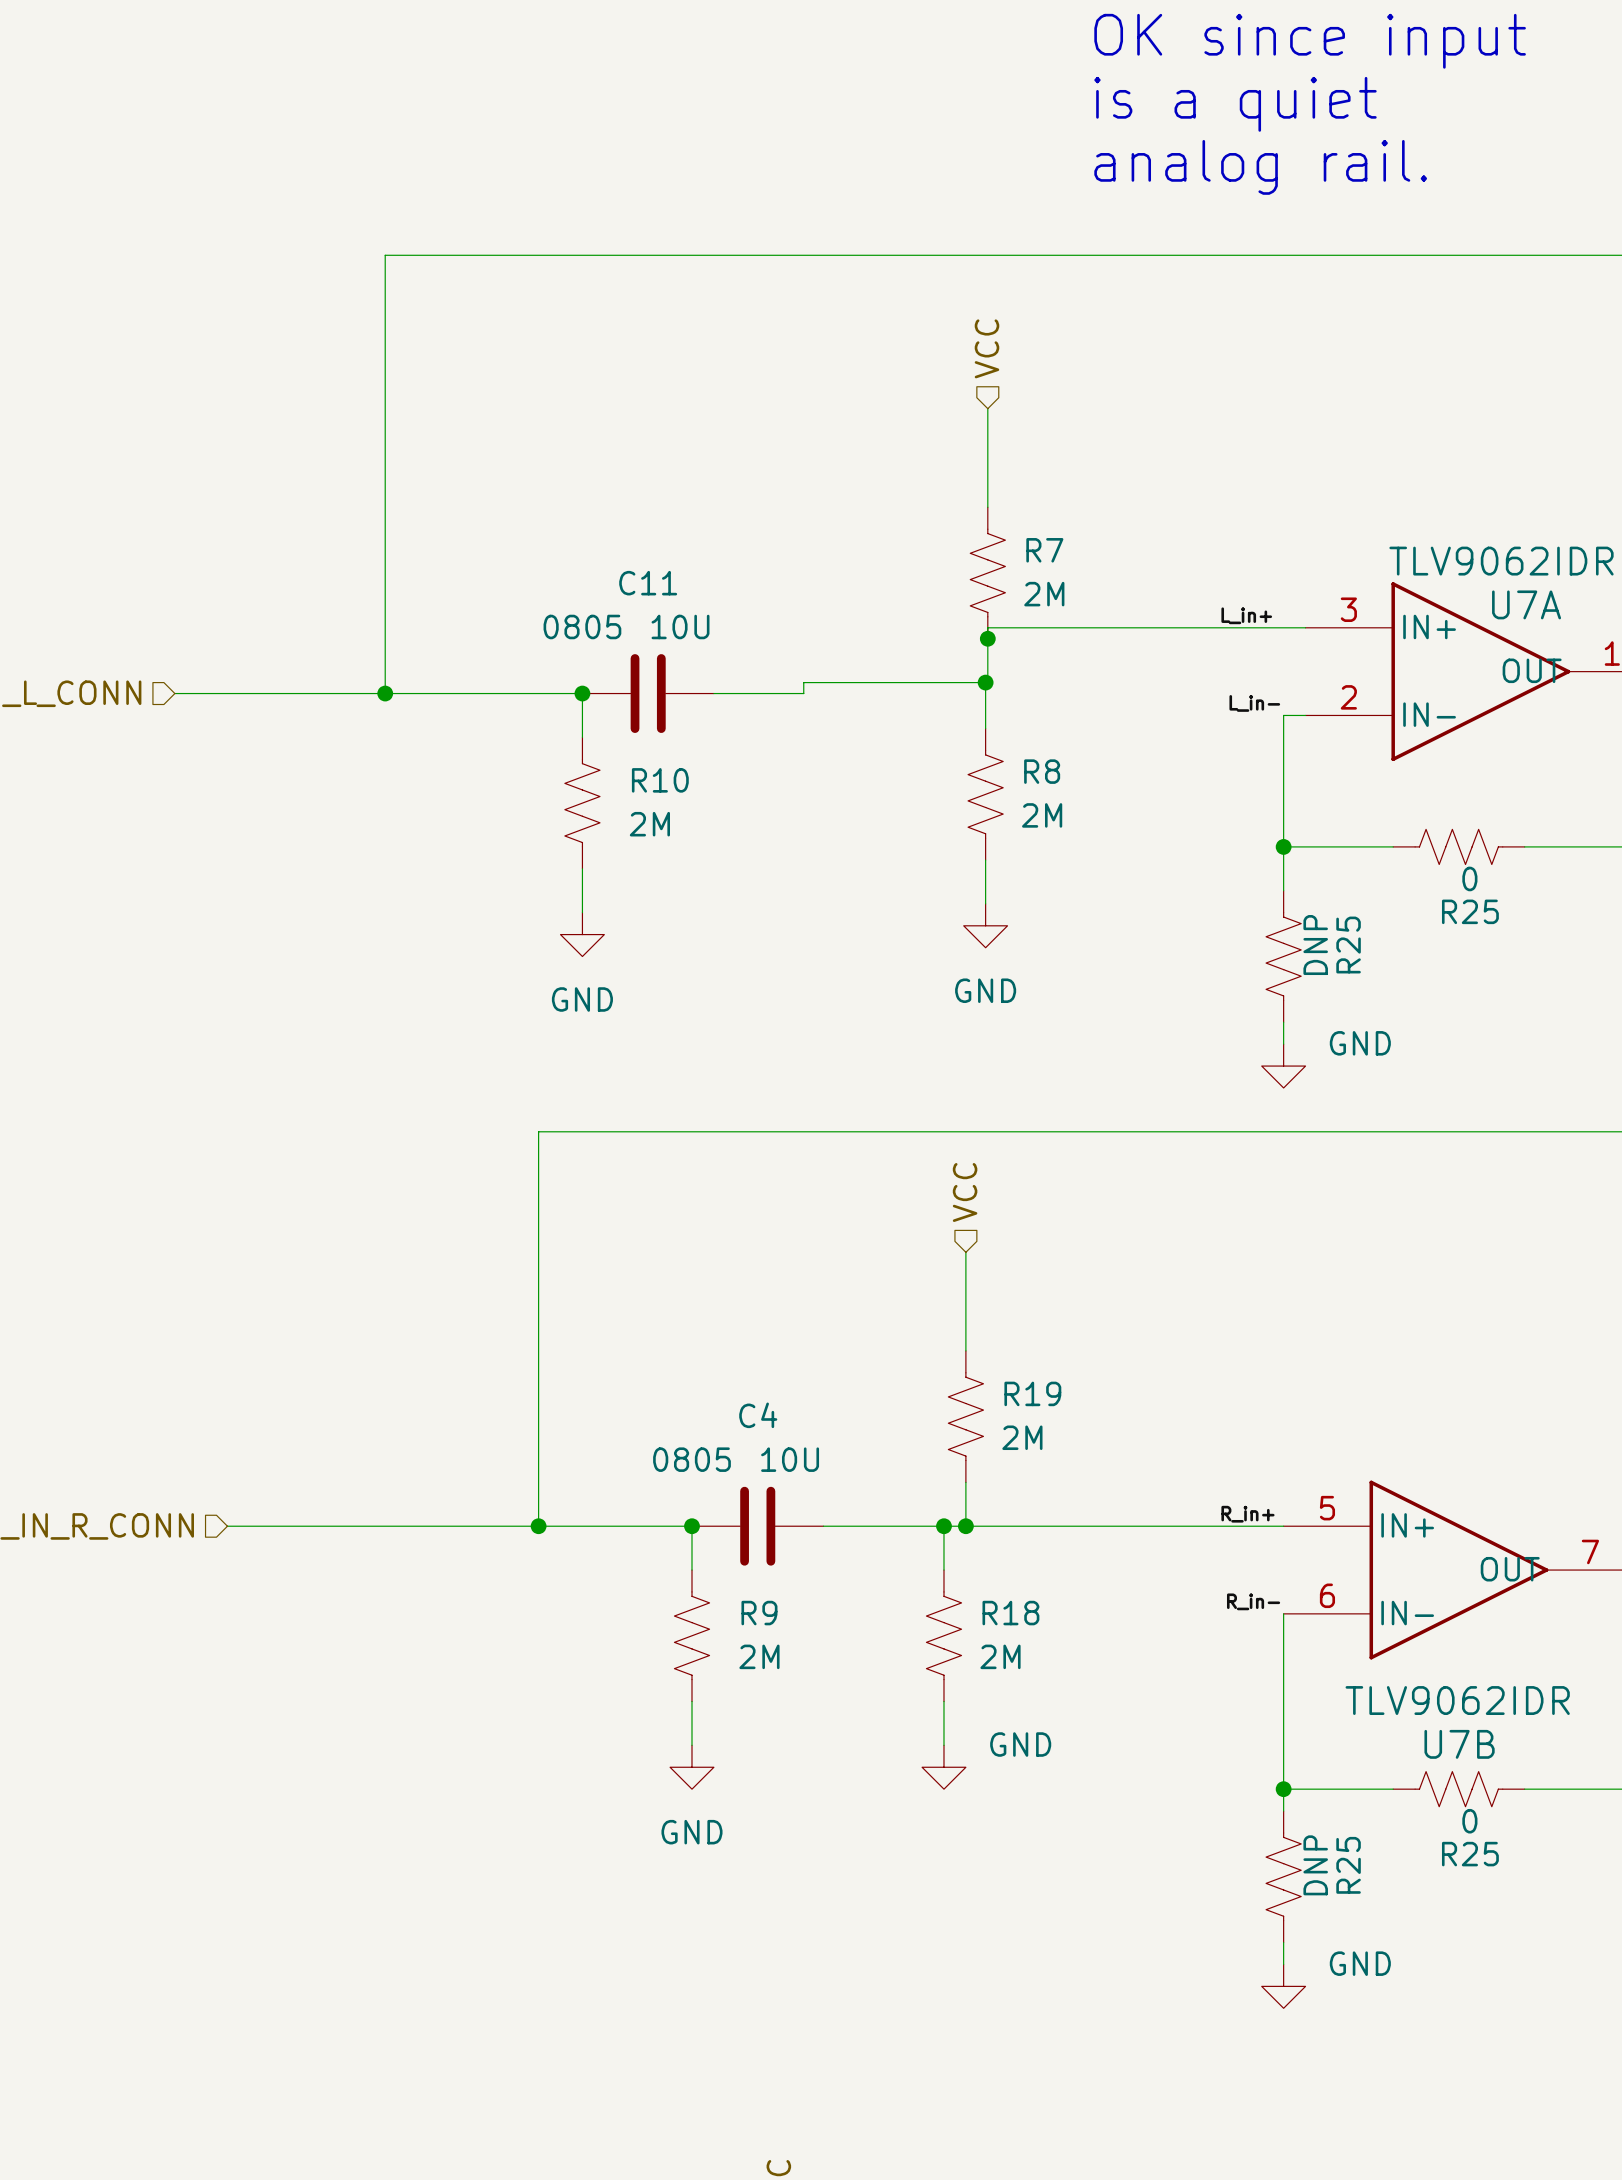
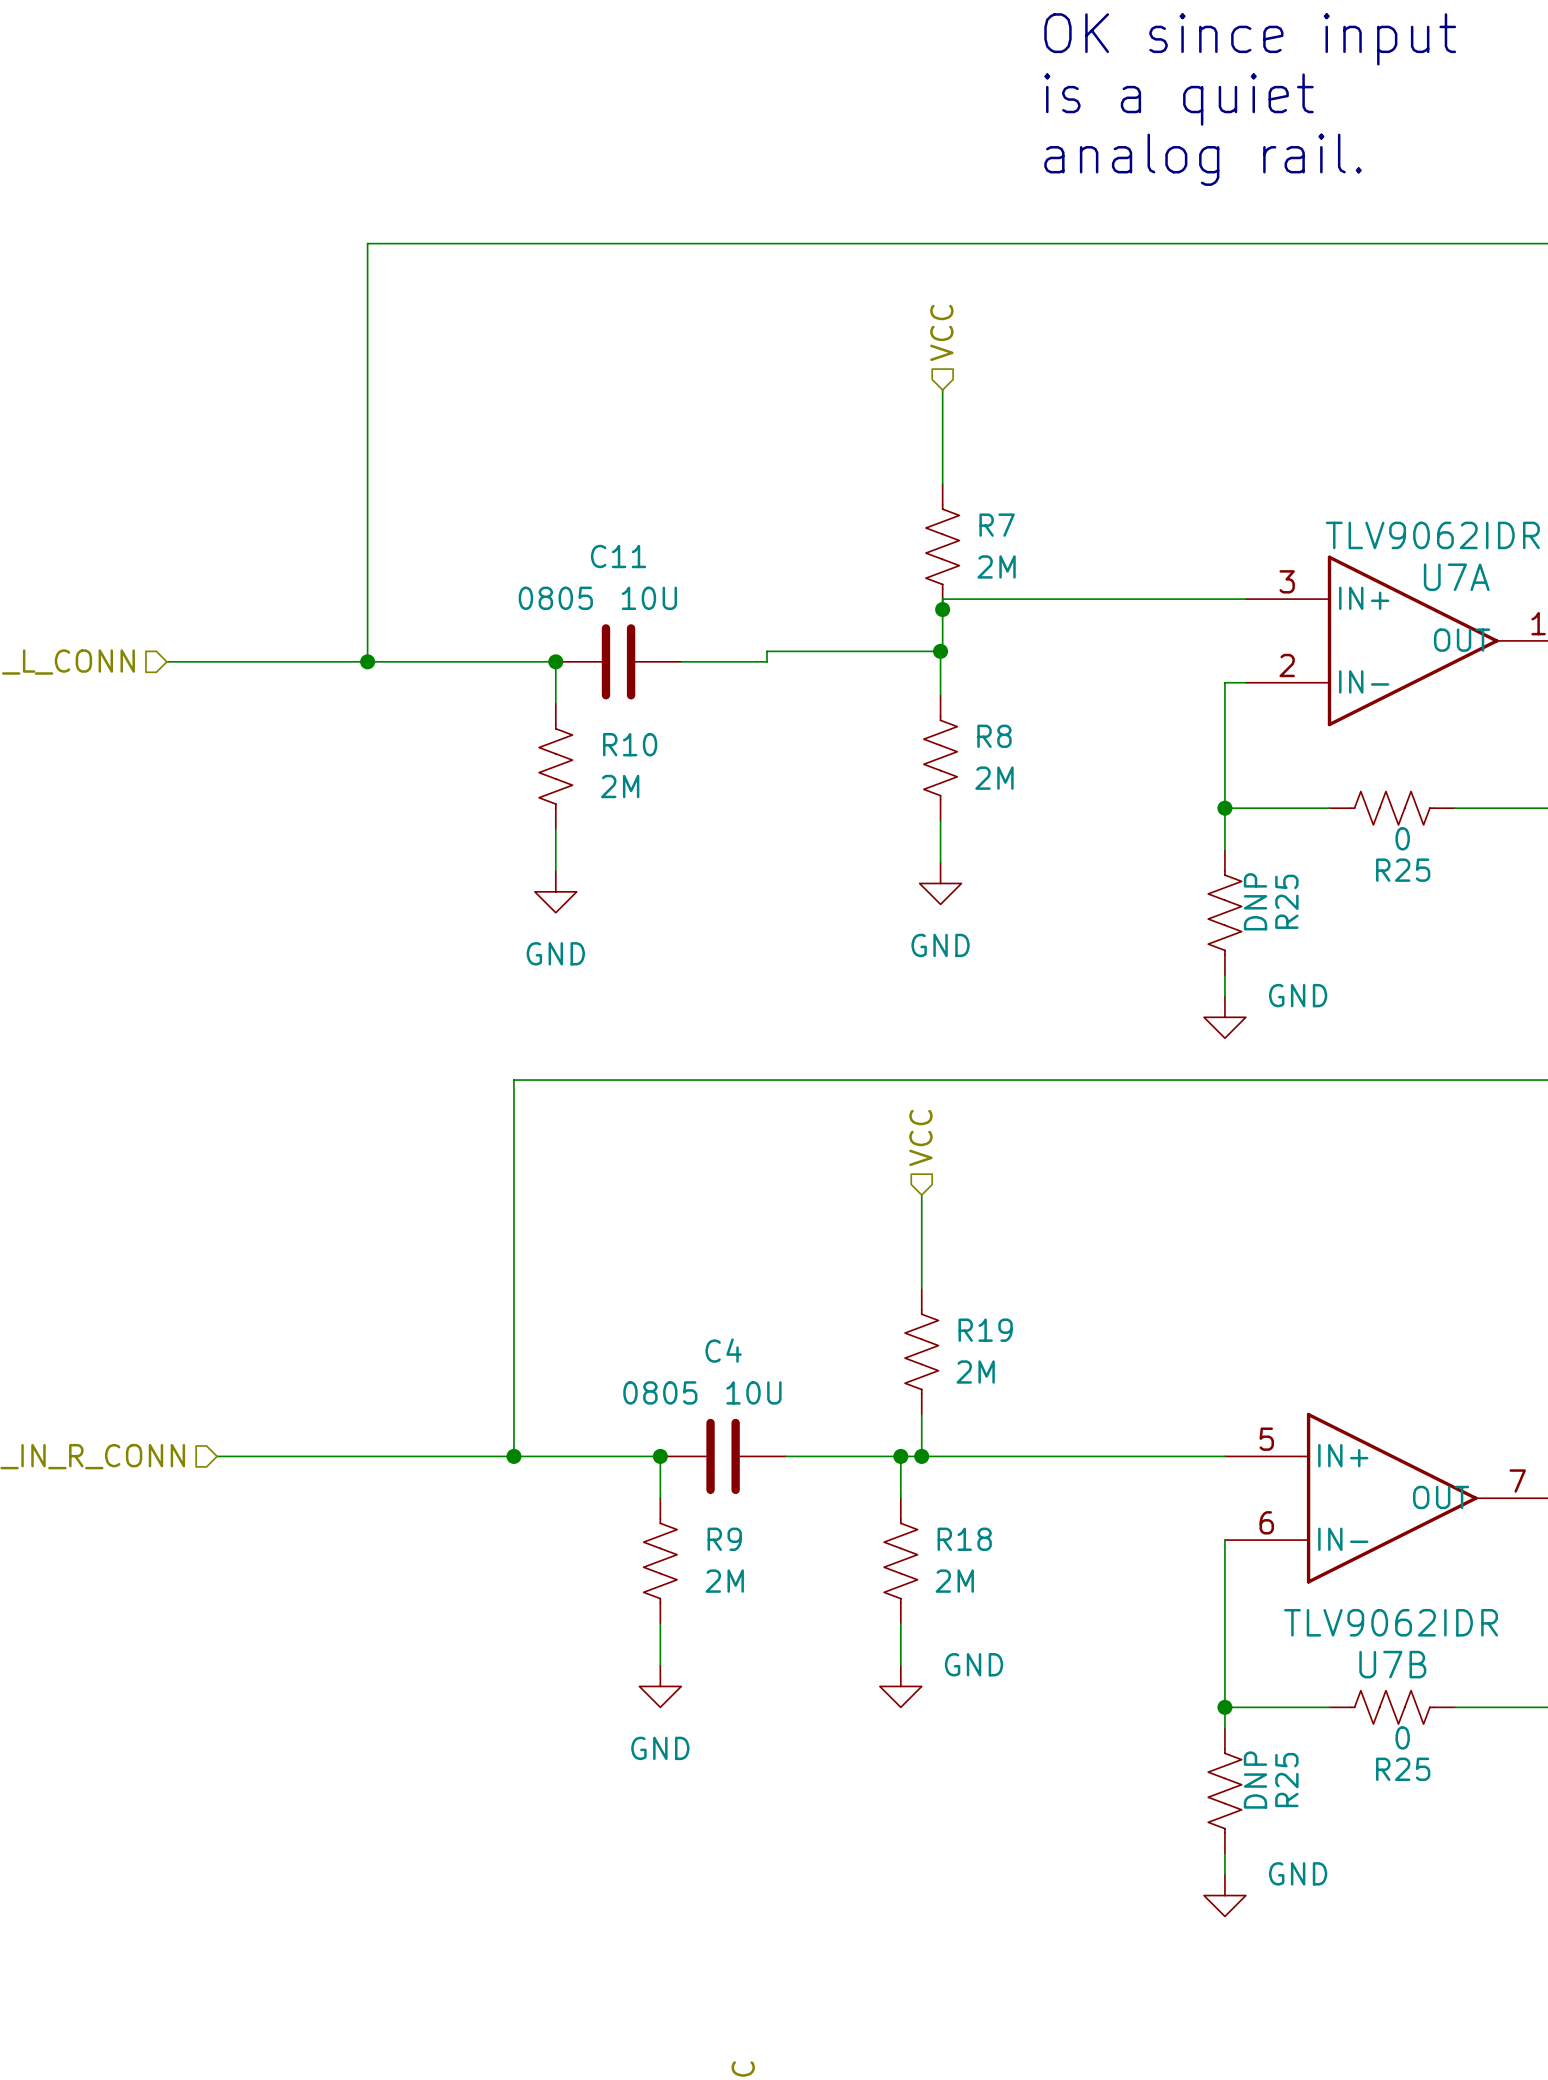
label: L_in+ (1246, 615) -> none
label: L_in- (1254, 703) -> none
label: R_in+ (1247, 1514) -> none
label: R_in- (1253, 1601) -> none

